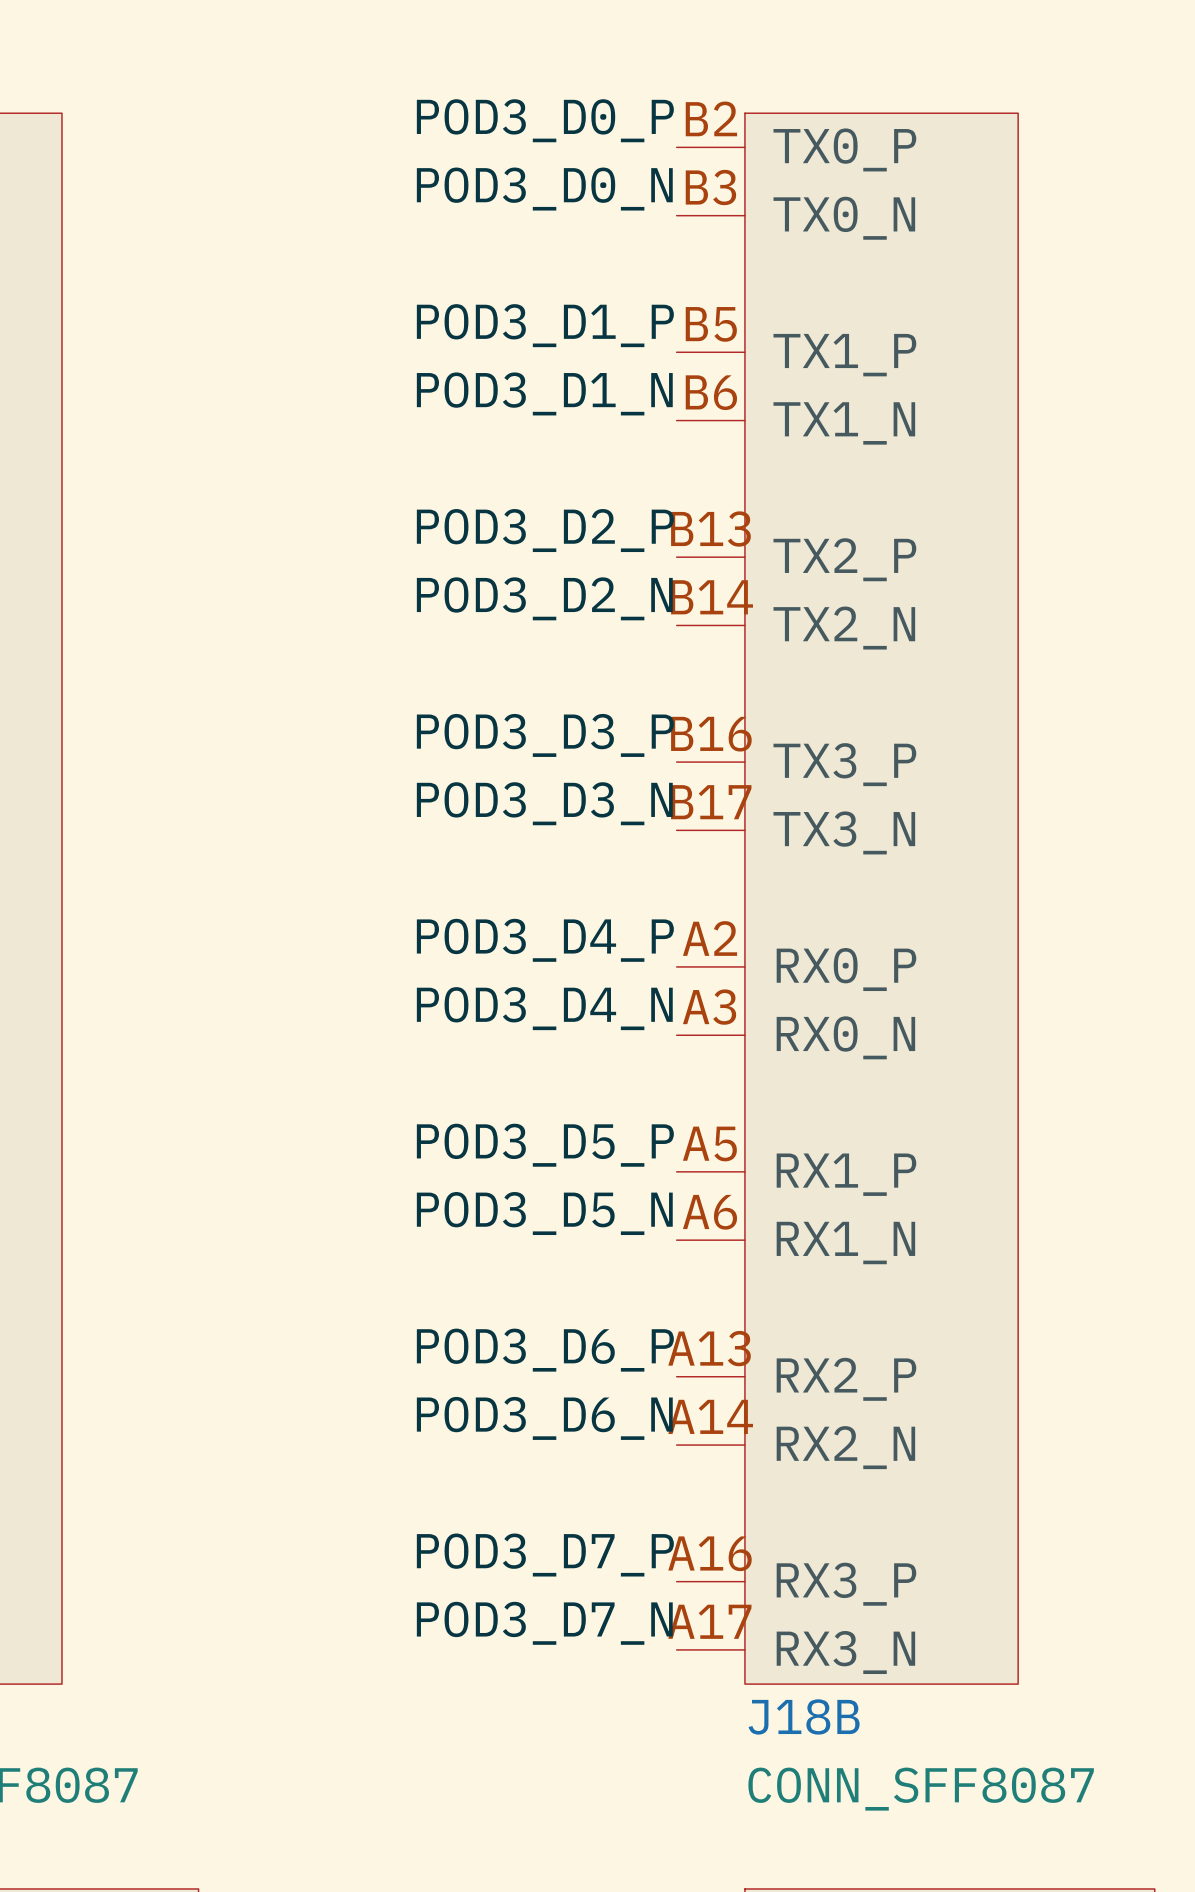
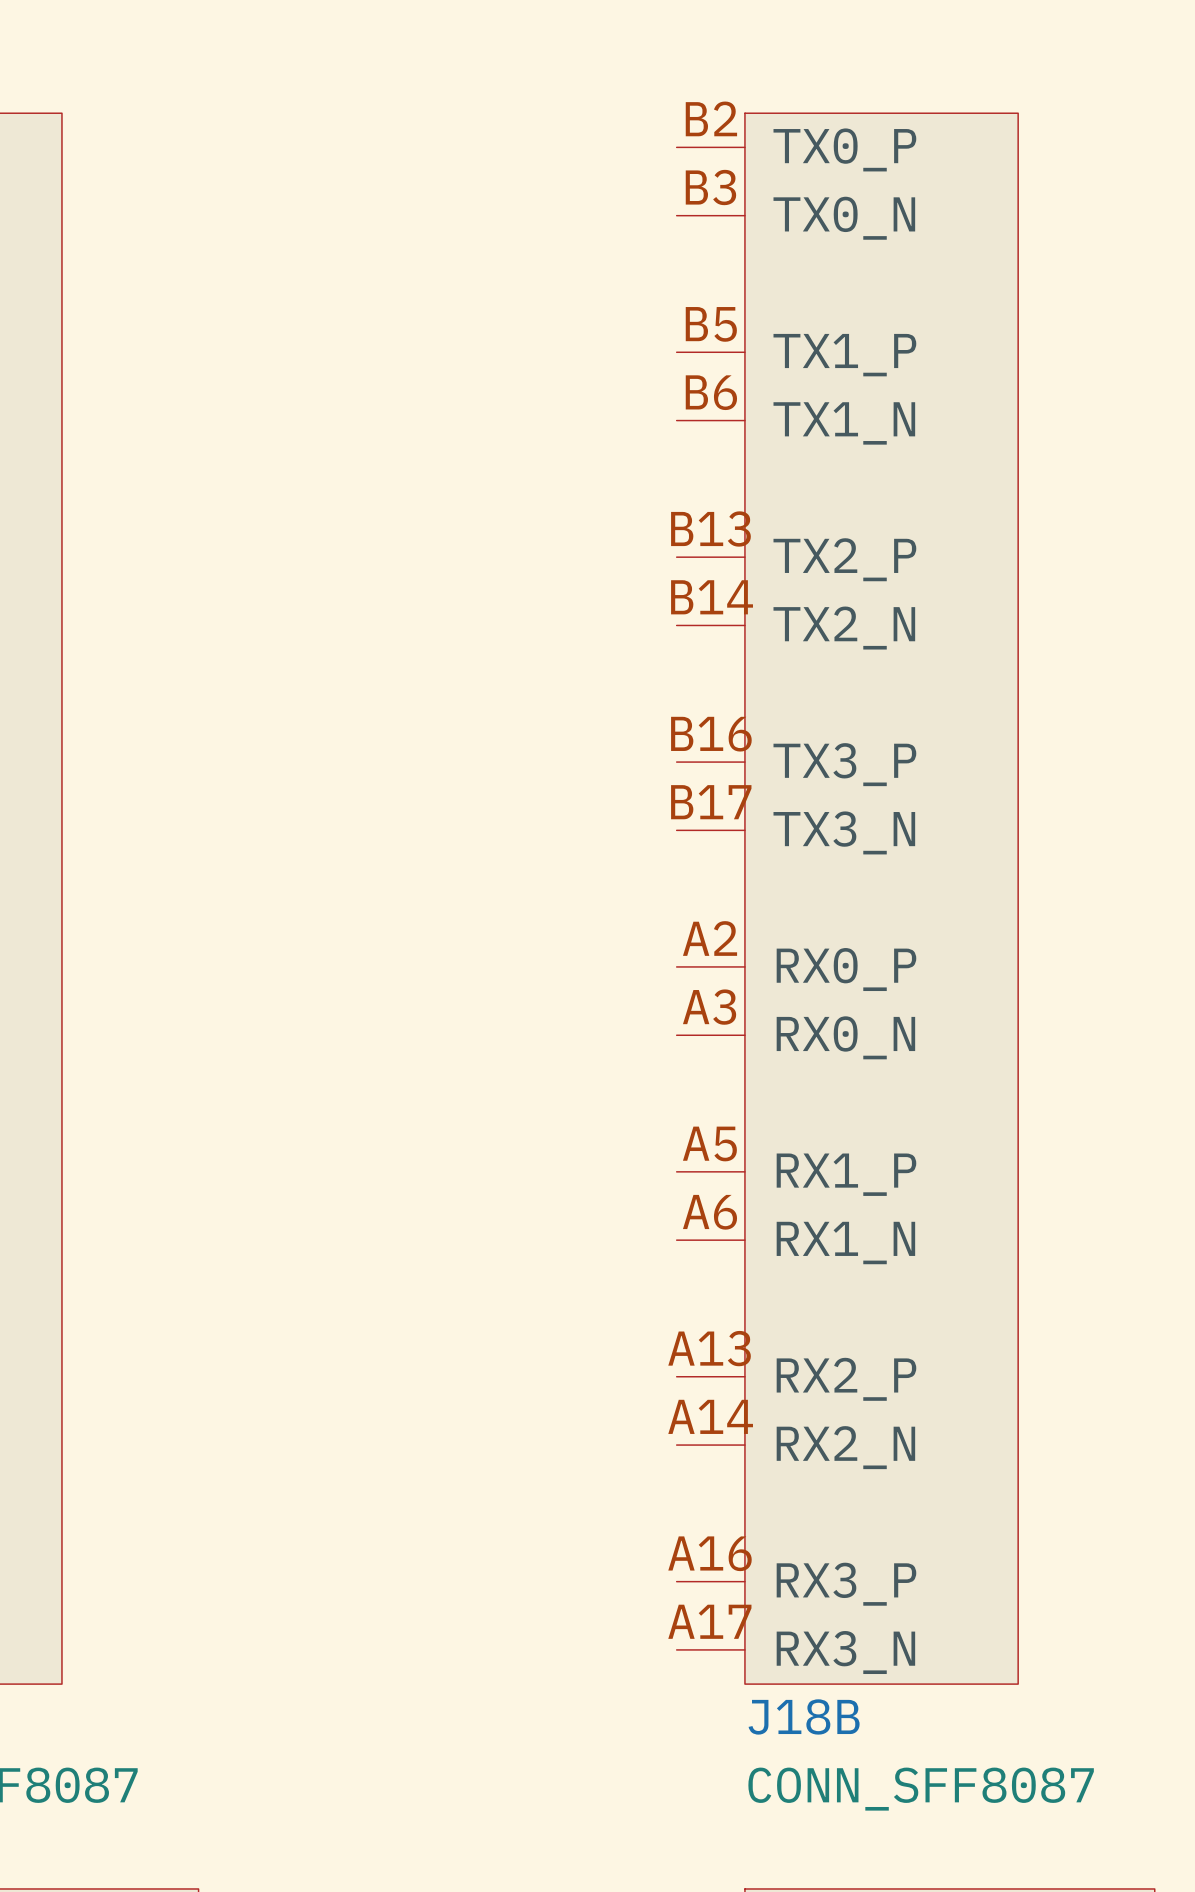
label: POD3_D0_P (545, 120) -> none
label: POD3_D0_N (544, 189) -> none
label: POD3_D1_P (545, 325) -> none
label: POD3_D1_N (544, 393) -> none
label: POD3_D2_P (545, 530) -> none
label: POD3_D2_N (544, 598) -> none
label: POD3_D3_P (545, 735) -> none
label: POD3_D3_N (544, 803) -> none
label: POD3_D4_P (545, 940) -> none
label: POD3_D4_N (544, 1008) -> none
label: POD3_D5_P (545, 1145) -> none
label: POD3_D5_N (544, 1213) -> none
label: POD3_D6_P (545, 1350) -> none
label: POD3_D6_N (544, 1418) -> none
label: POD3_D7_P (545, 1555) -> none
label: POD3_D7_N (544, 1623) -> none

